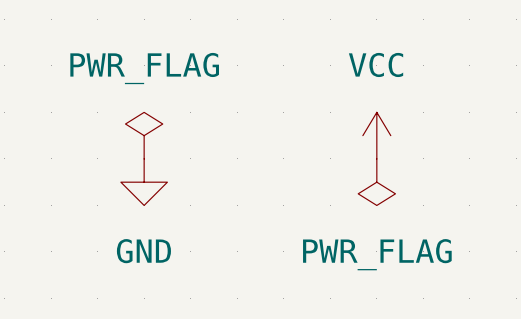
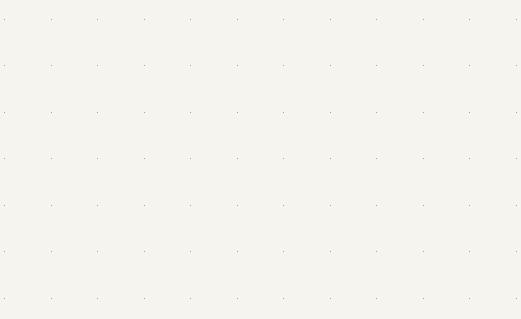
power symbol: PWR_FLAG (144, 135) -> none
power symbol: VCC (376, 135) -> none
power symbol: GND (144, 182) -> none
power symbol: PWR_FLAG (376, 182) -> none

